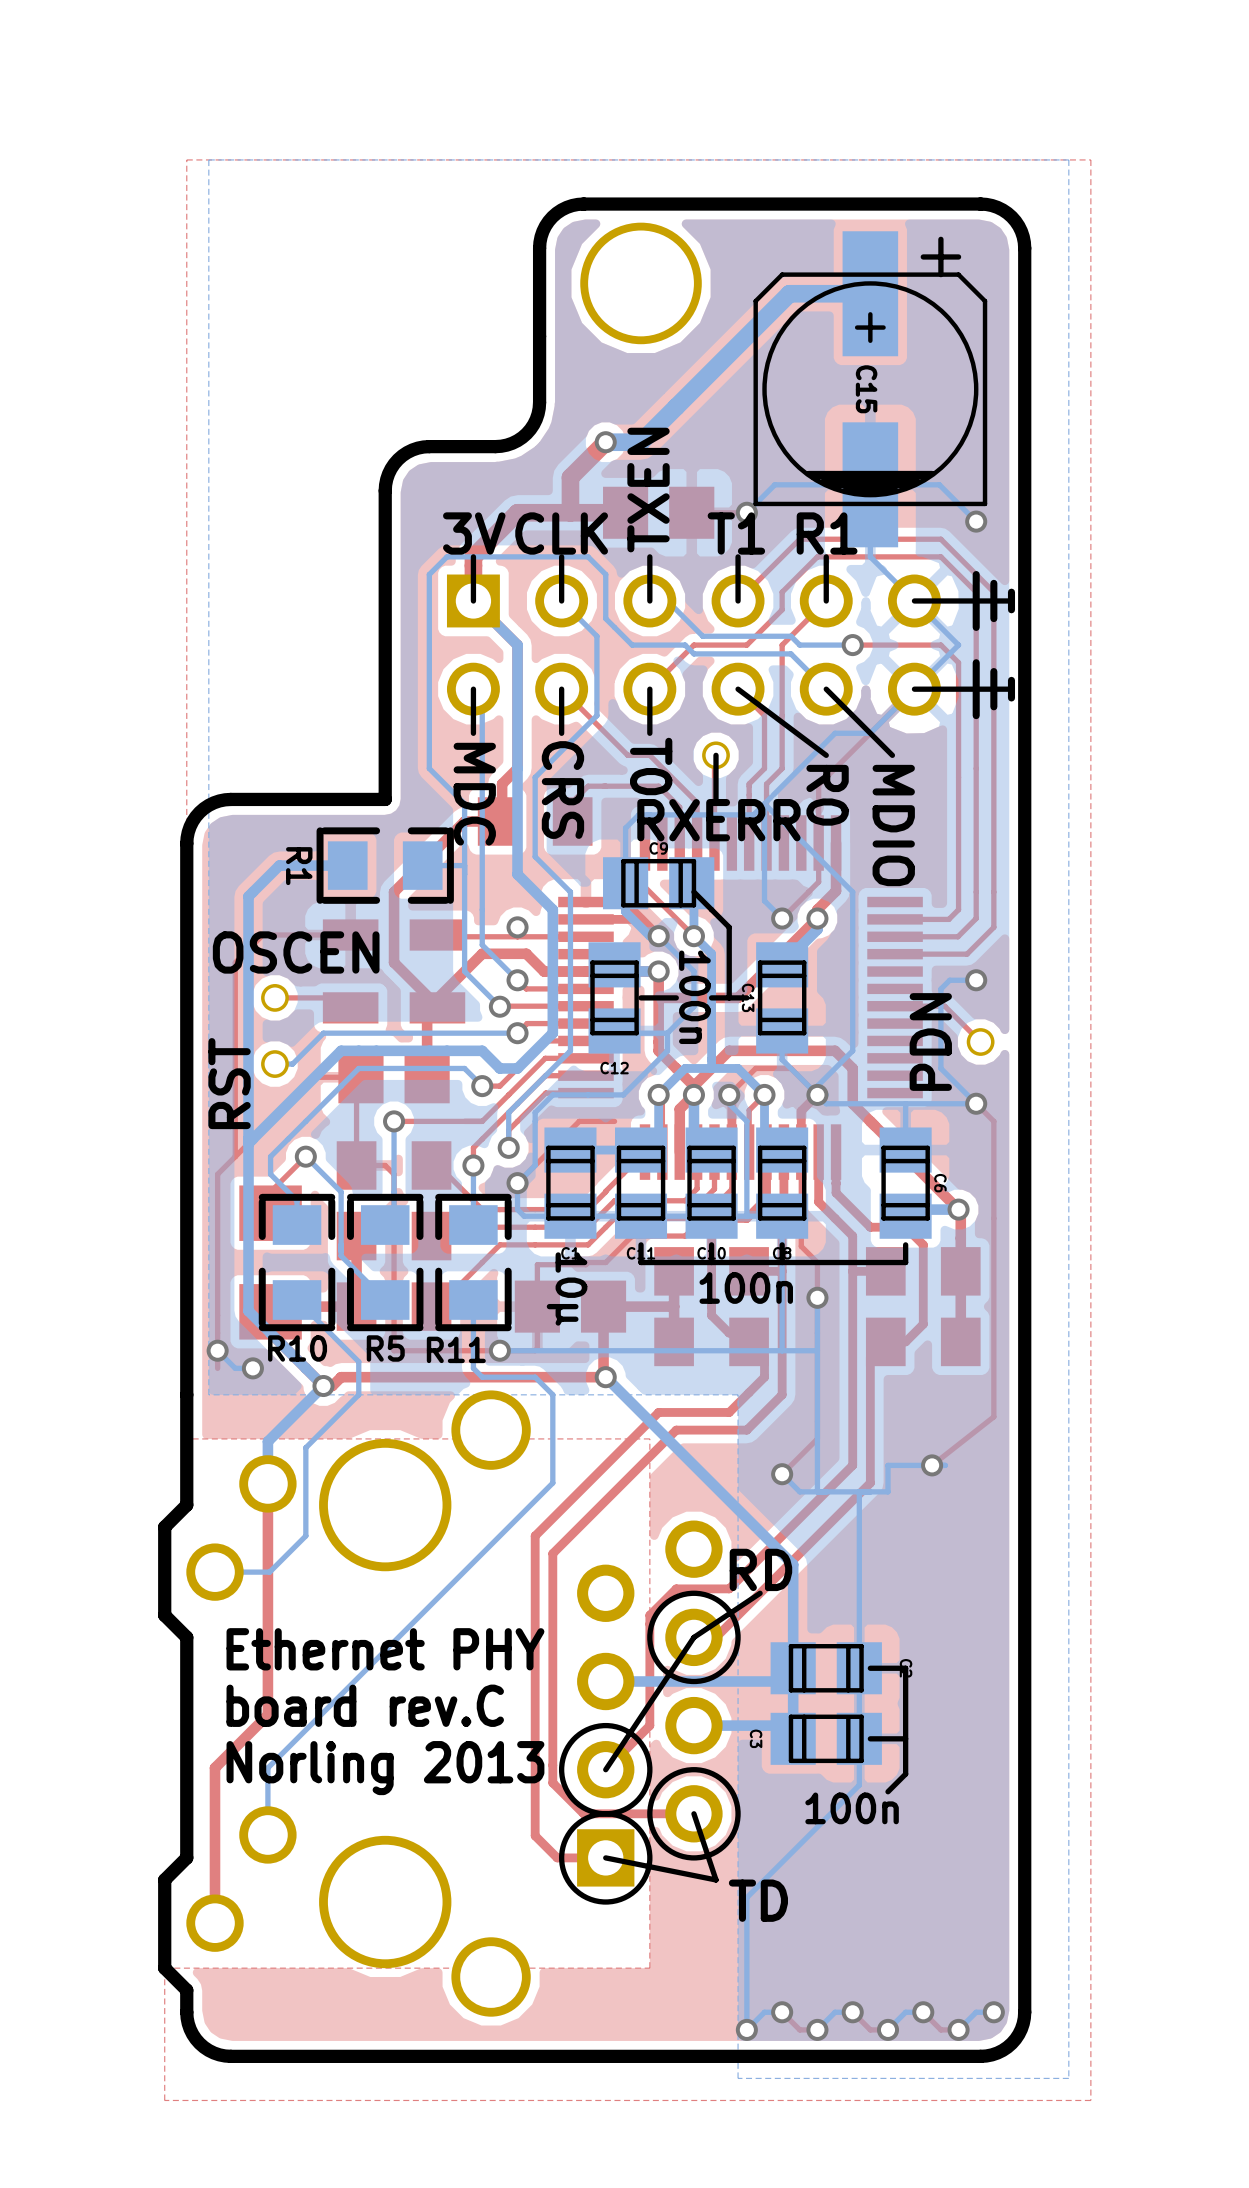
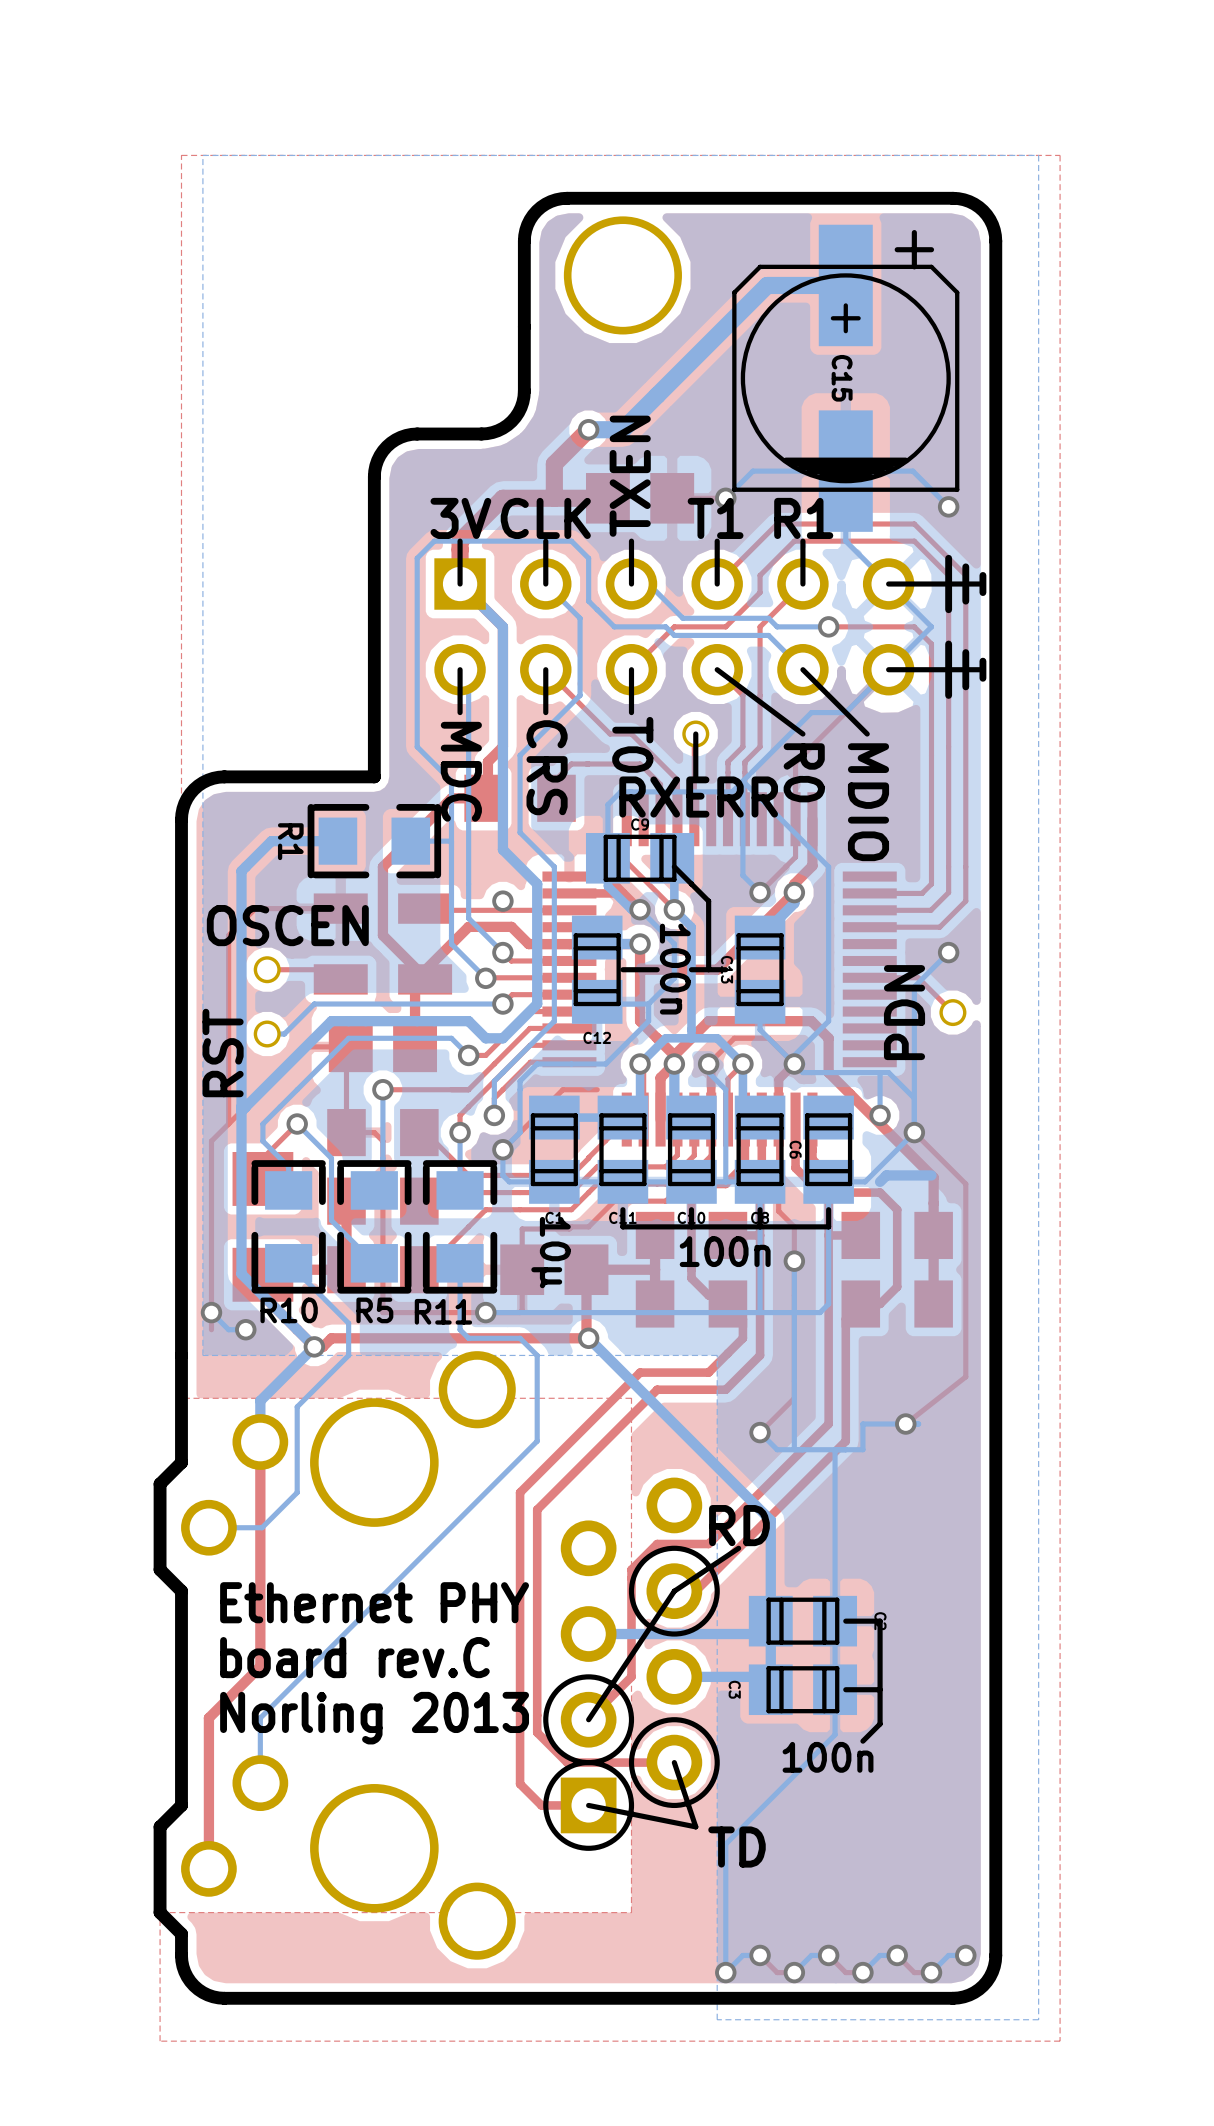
bottom track: (976, 980) (949, 980) (940, 989) (940, 1015) -> (948, 952) (914, 986)
bottom track: (940, 1068) (976, 1103) (914, 1103) -> (914, 1098) (888, 1072)
bottom track: none -> (914, 1038) (914, 1132) (865, 1181) (828, 1181) (828, 1304) (820, 1312) (794, 1312)
via: (976, 1103) -> none
via: none -> (880, 1115)
via: none -> (914, 1132)
C6 rotation: 0° (905, 1183) -> 180° (828, 1149)
via: (958, 1209) -> none
line: (905, 1244) (905, 1262) (852, 1262) -> (828, 1209) (828, 1226)

